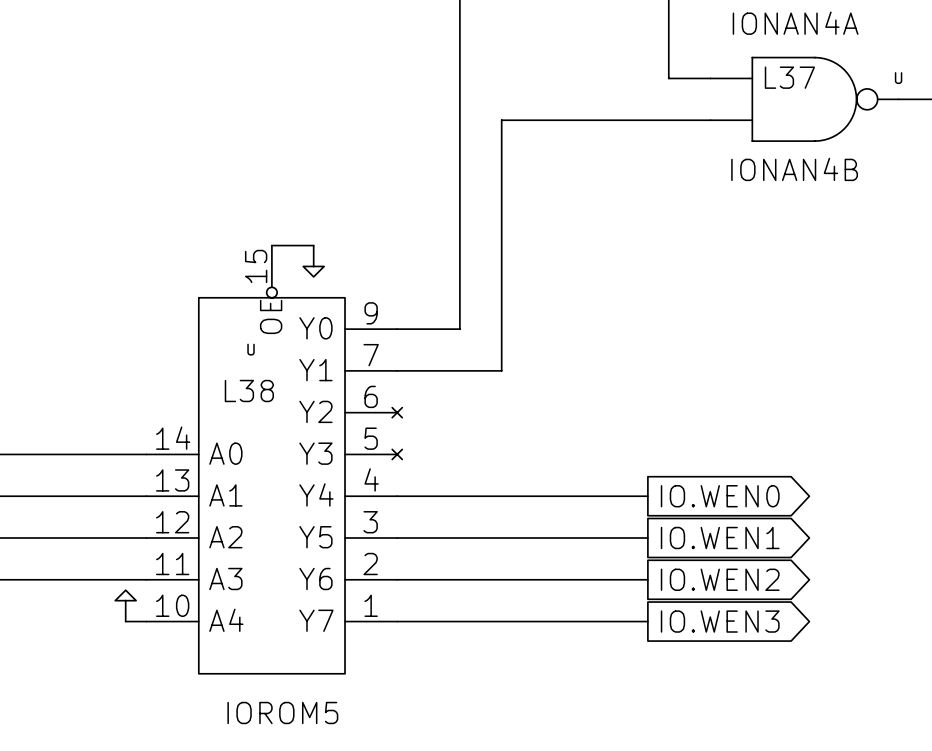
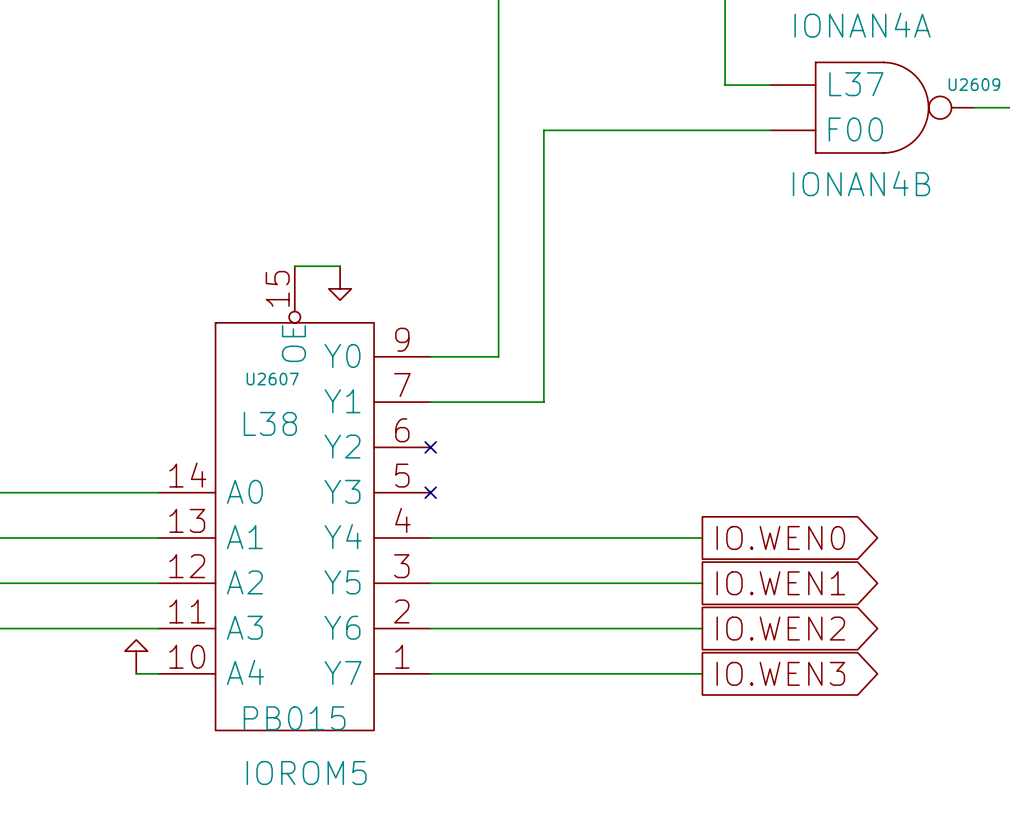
U name: U (898, 78) -> U2609 (974, 84)
U value: none -> F00 (855, 129)
U name: U (251, 349) -> U2607 (272, 379)
U value: none -> PB015 (294, 718)

